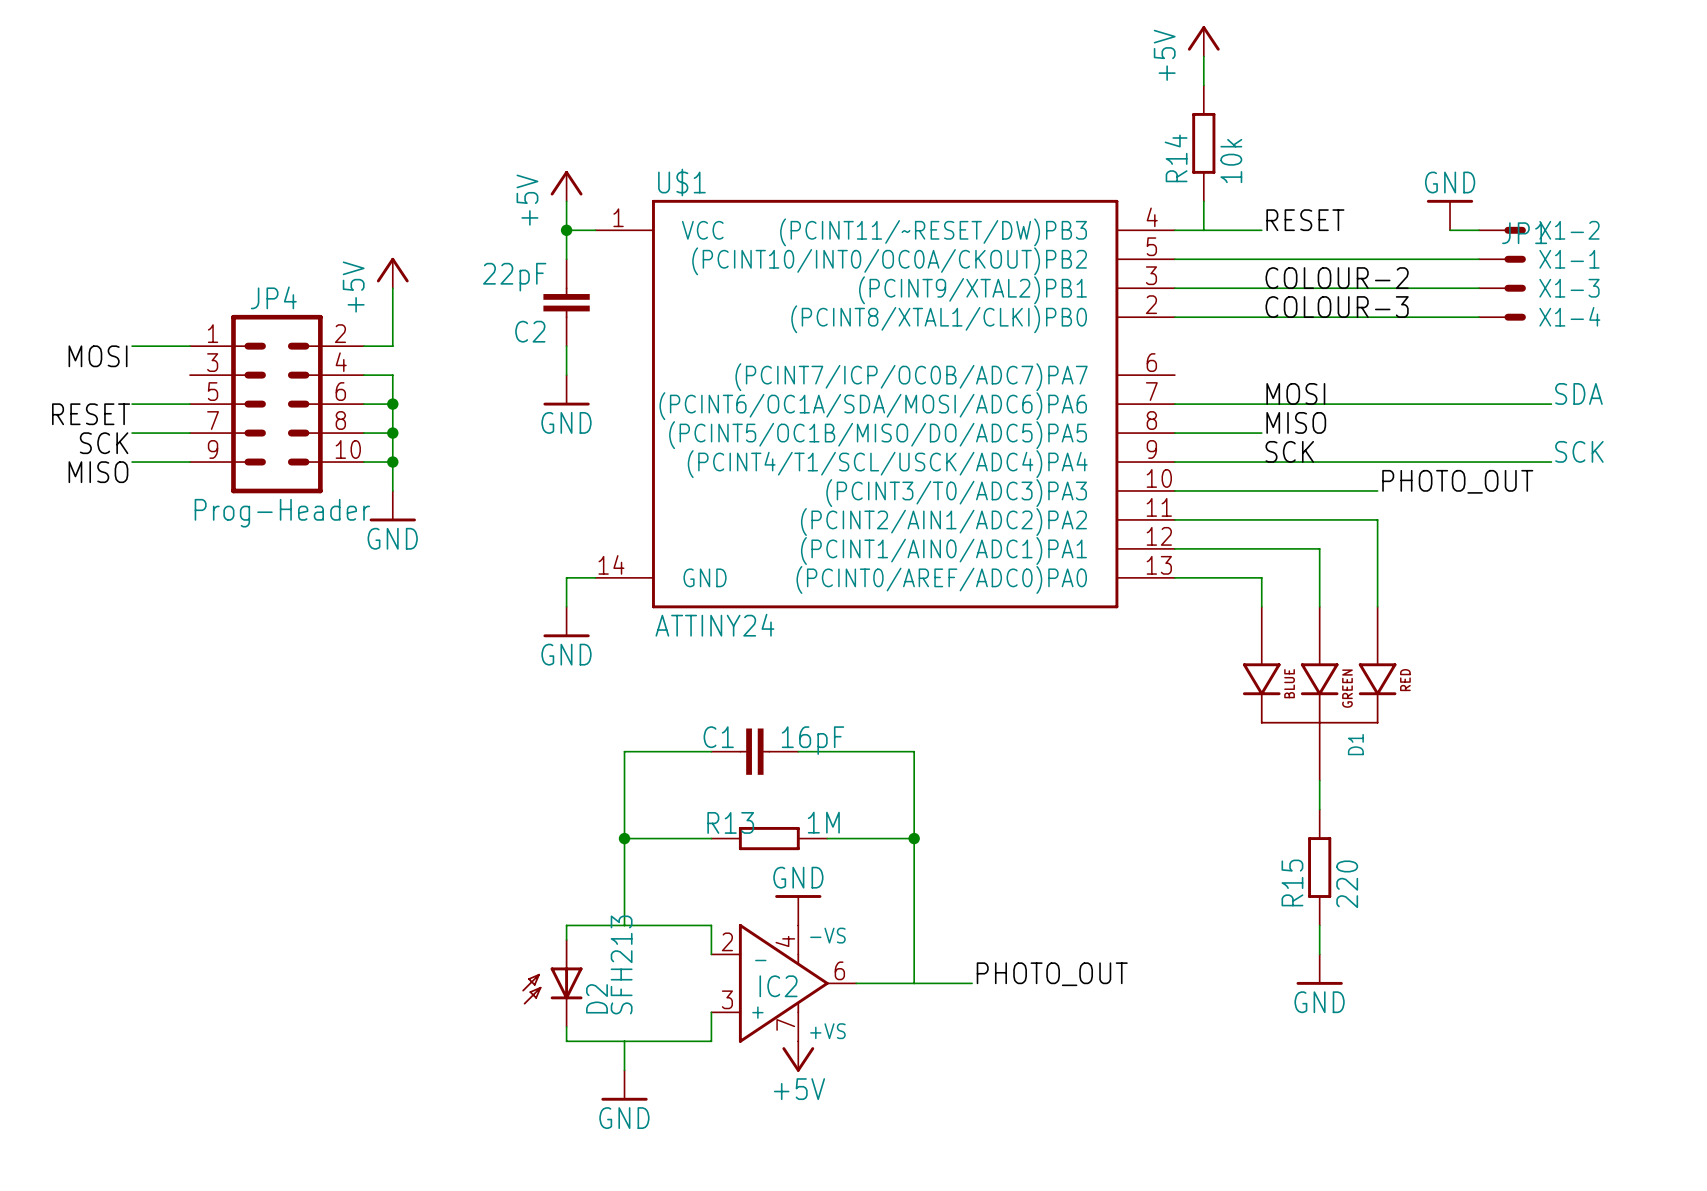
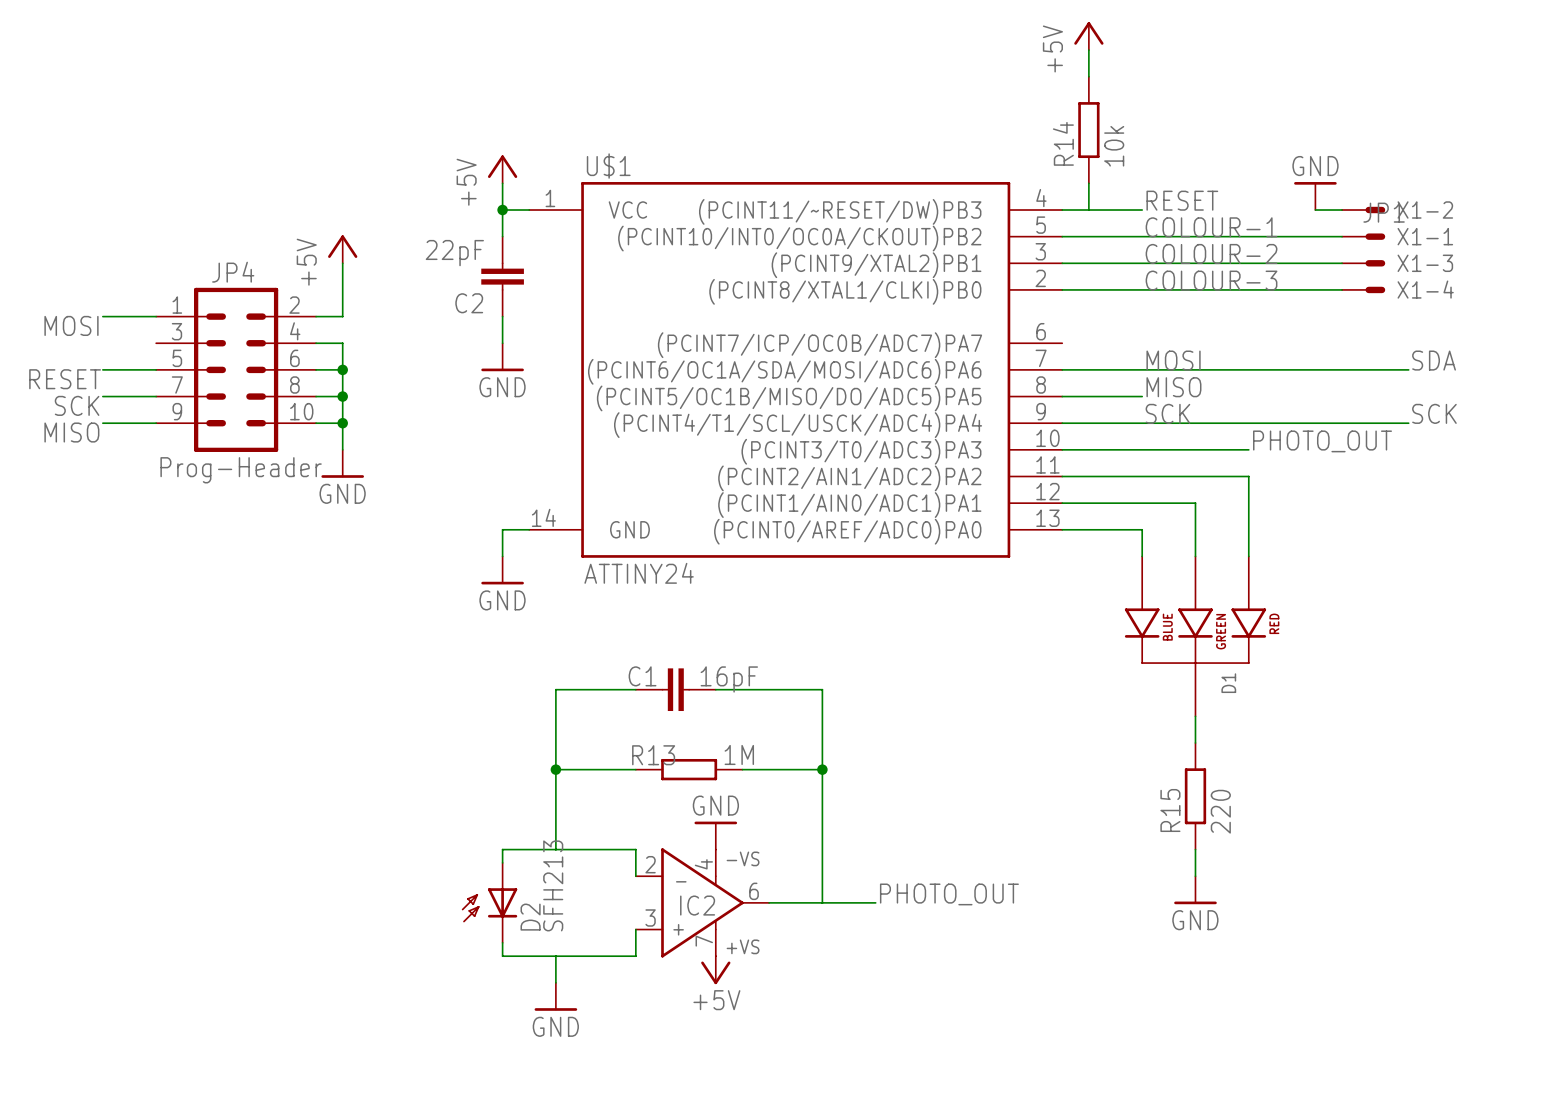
label: none -> COLOUR-1 (1211, 227)

